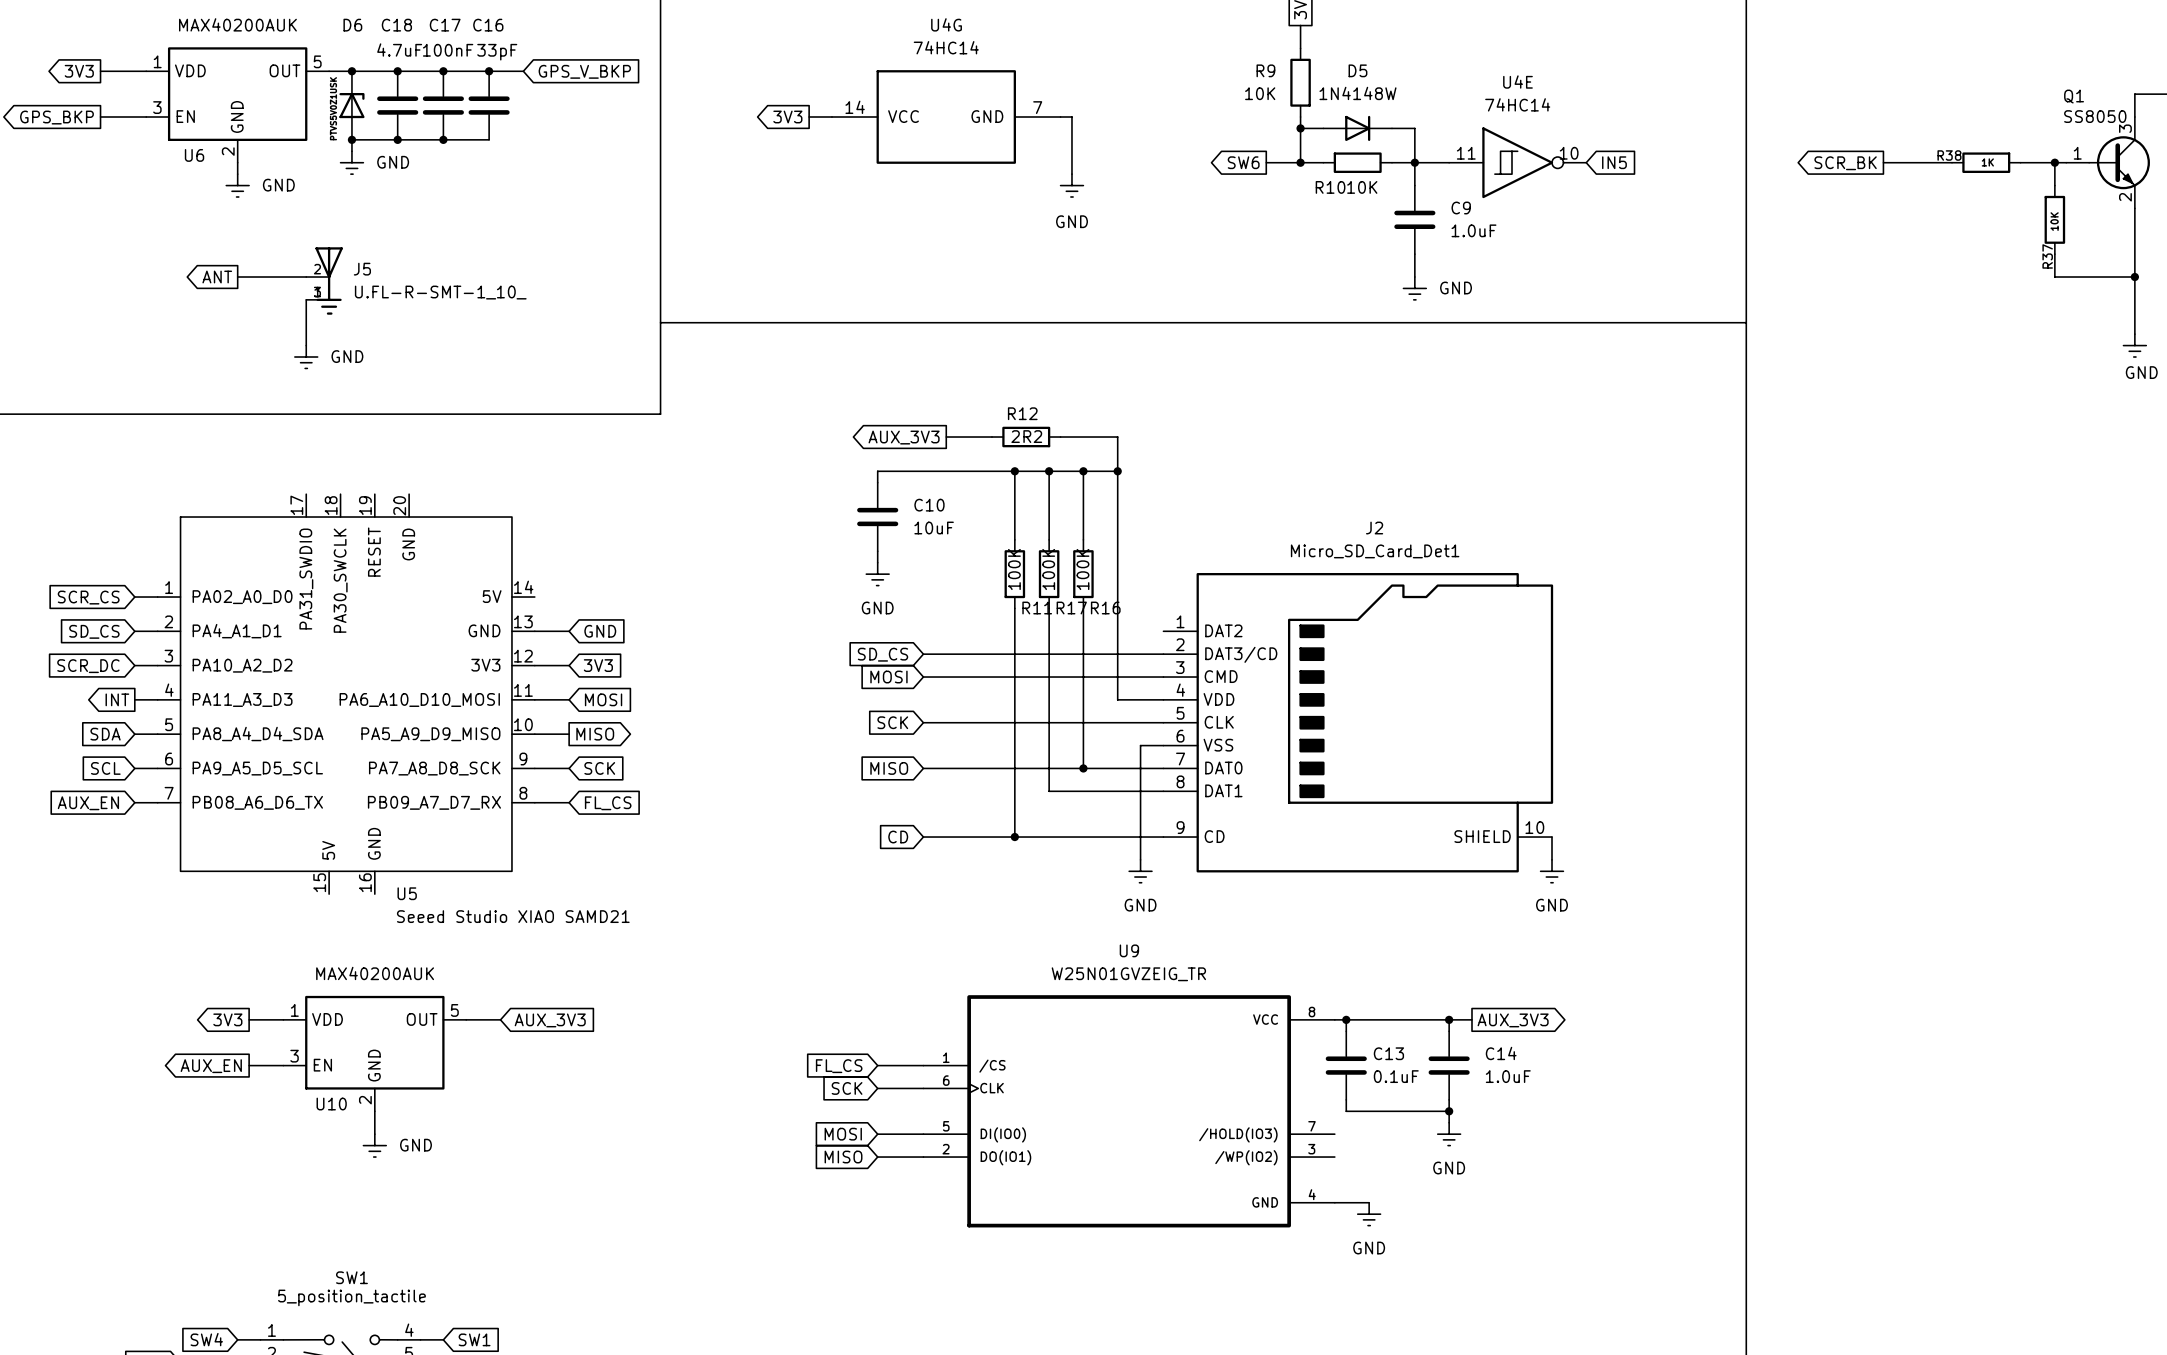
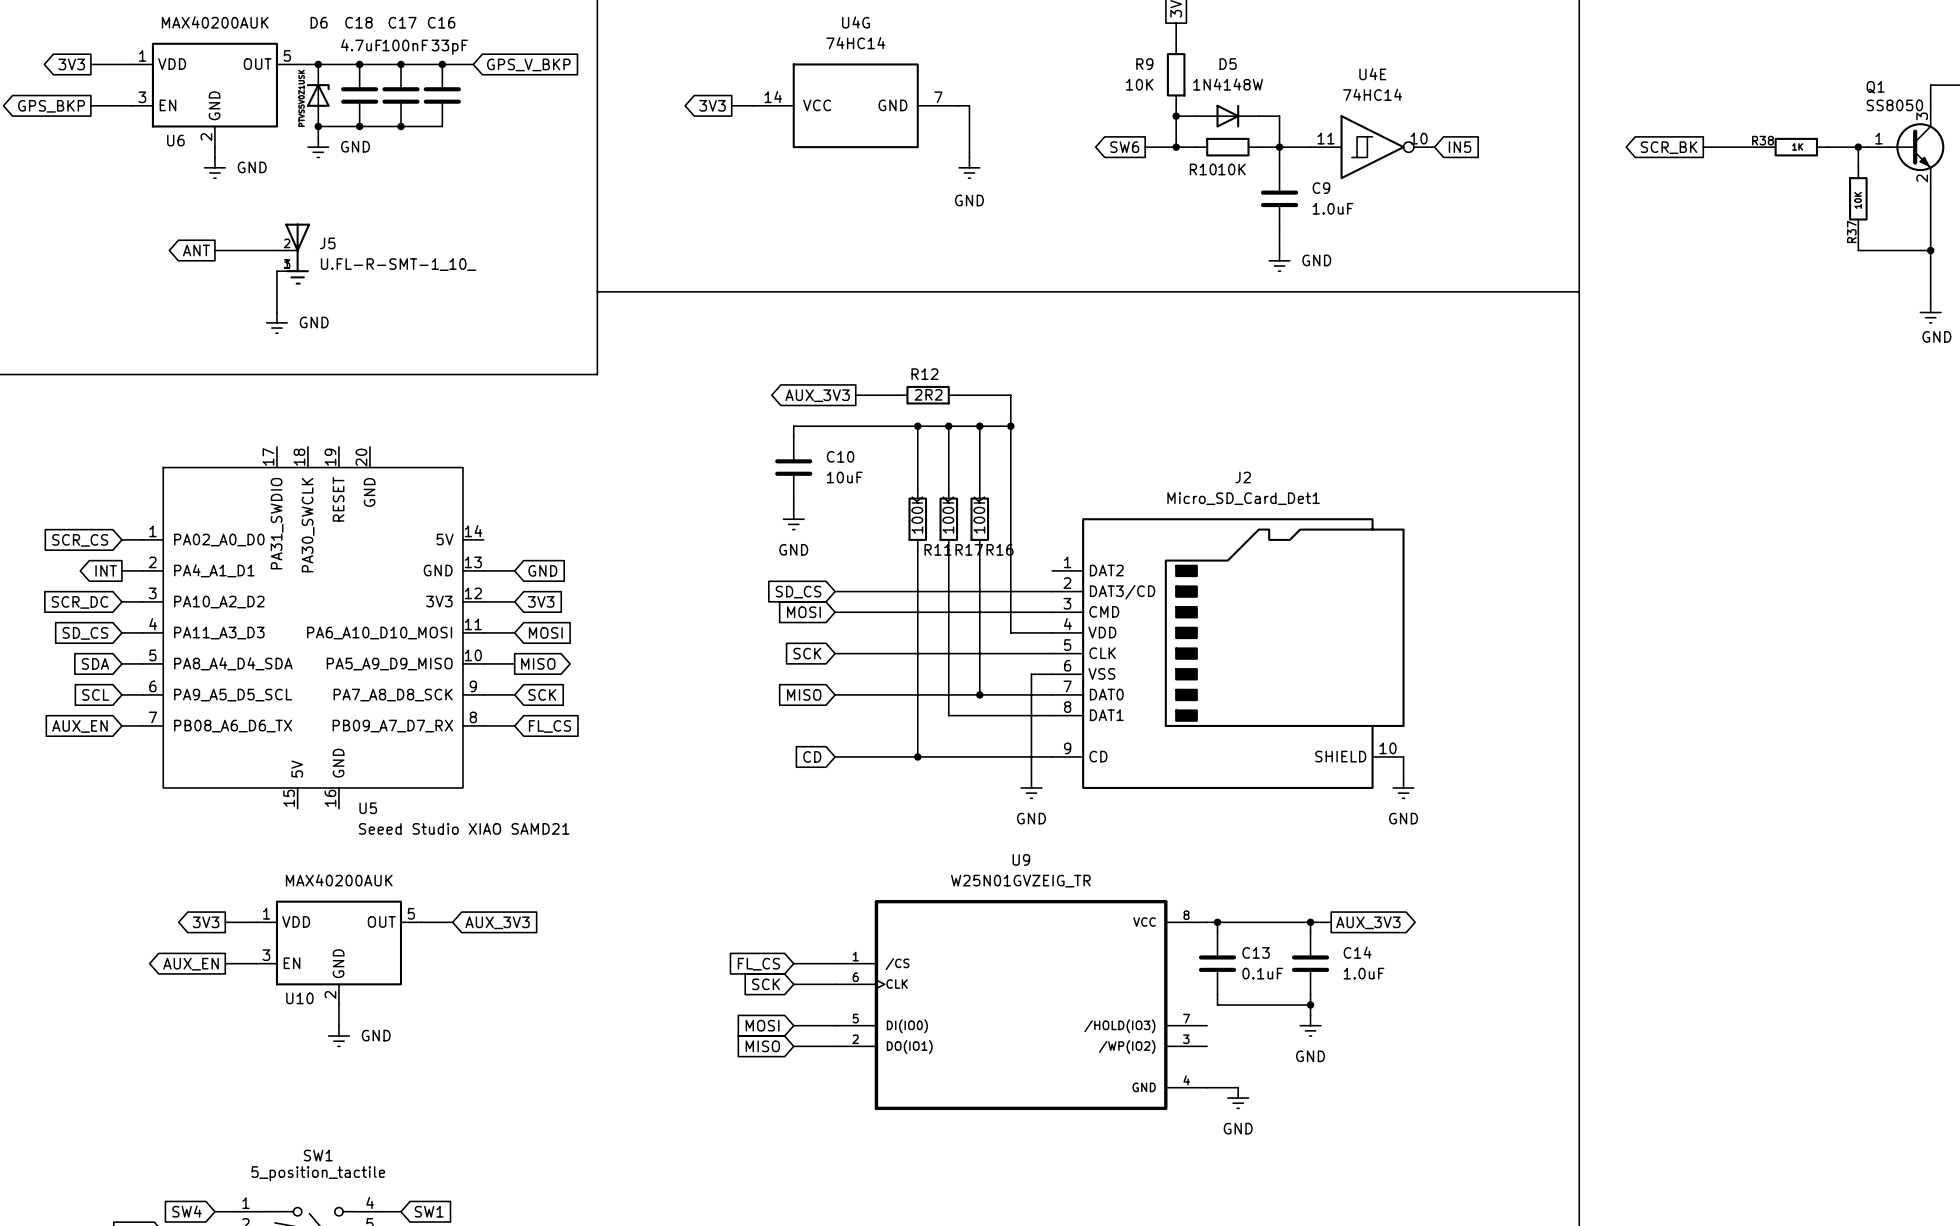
global label shape: input (94, 631) -> output (106, 570)
global label: SD_CS (94, 631) -> INT (106, 570)
global label shape: output (117, 699) -> input (85, 633)
global label: INT (117, 699) -> SD_CS (85, 633)

